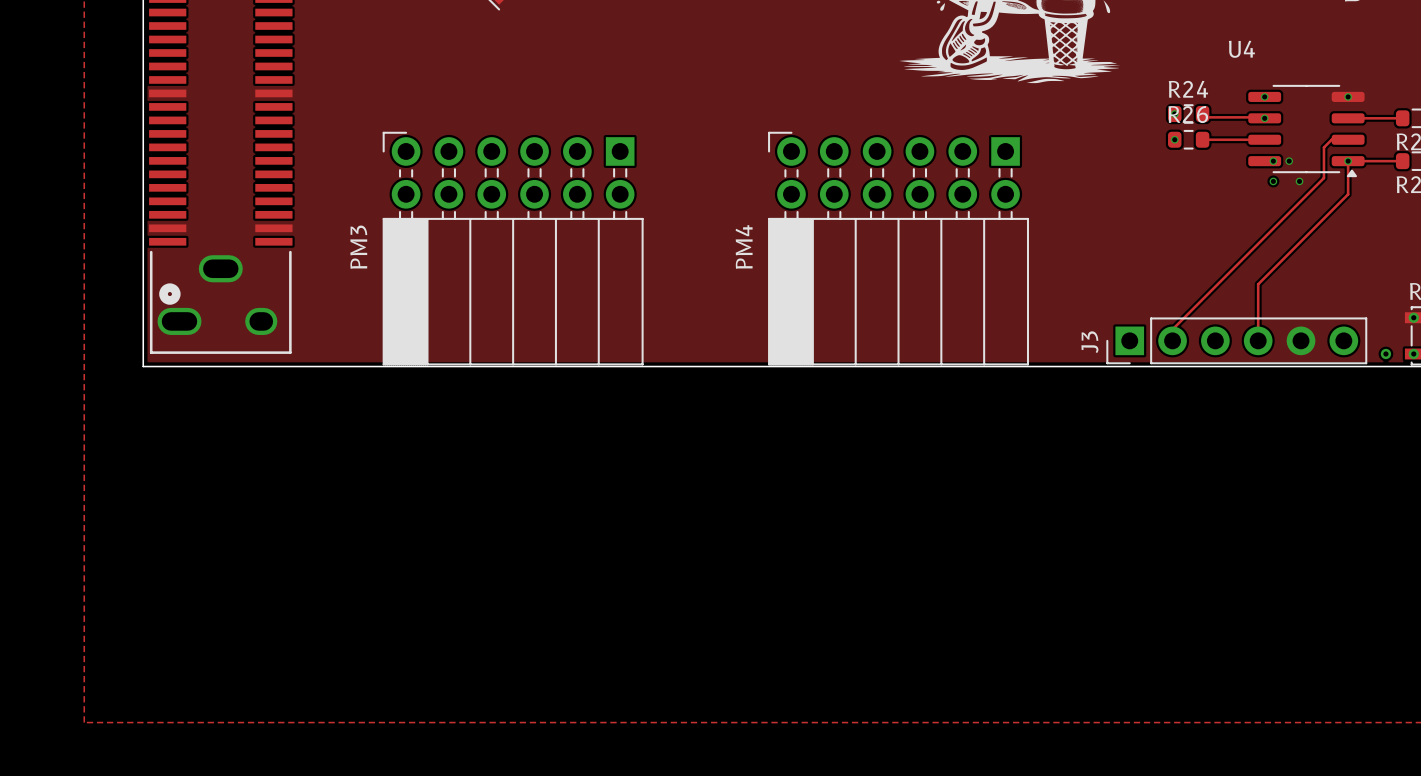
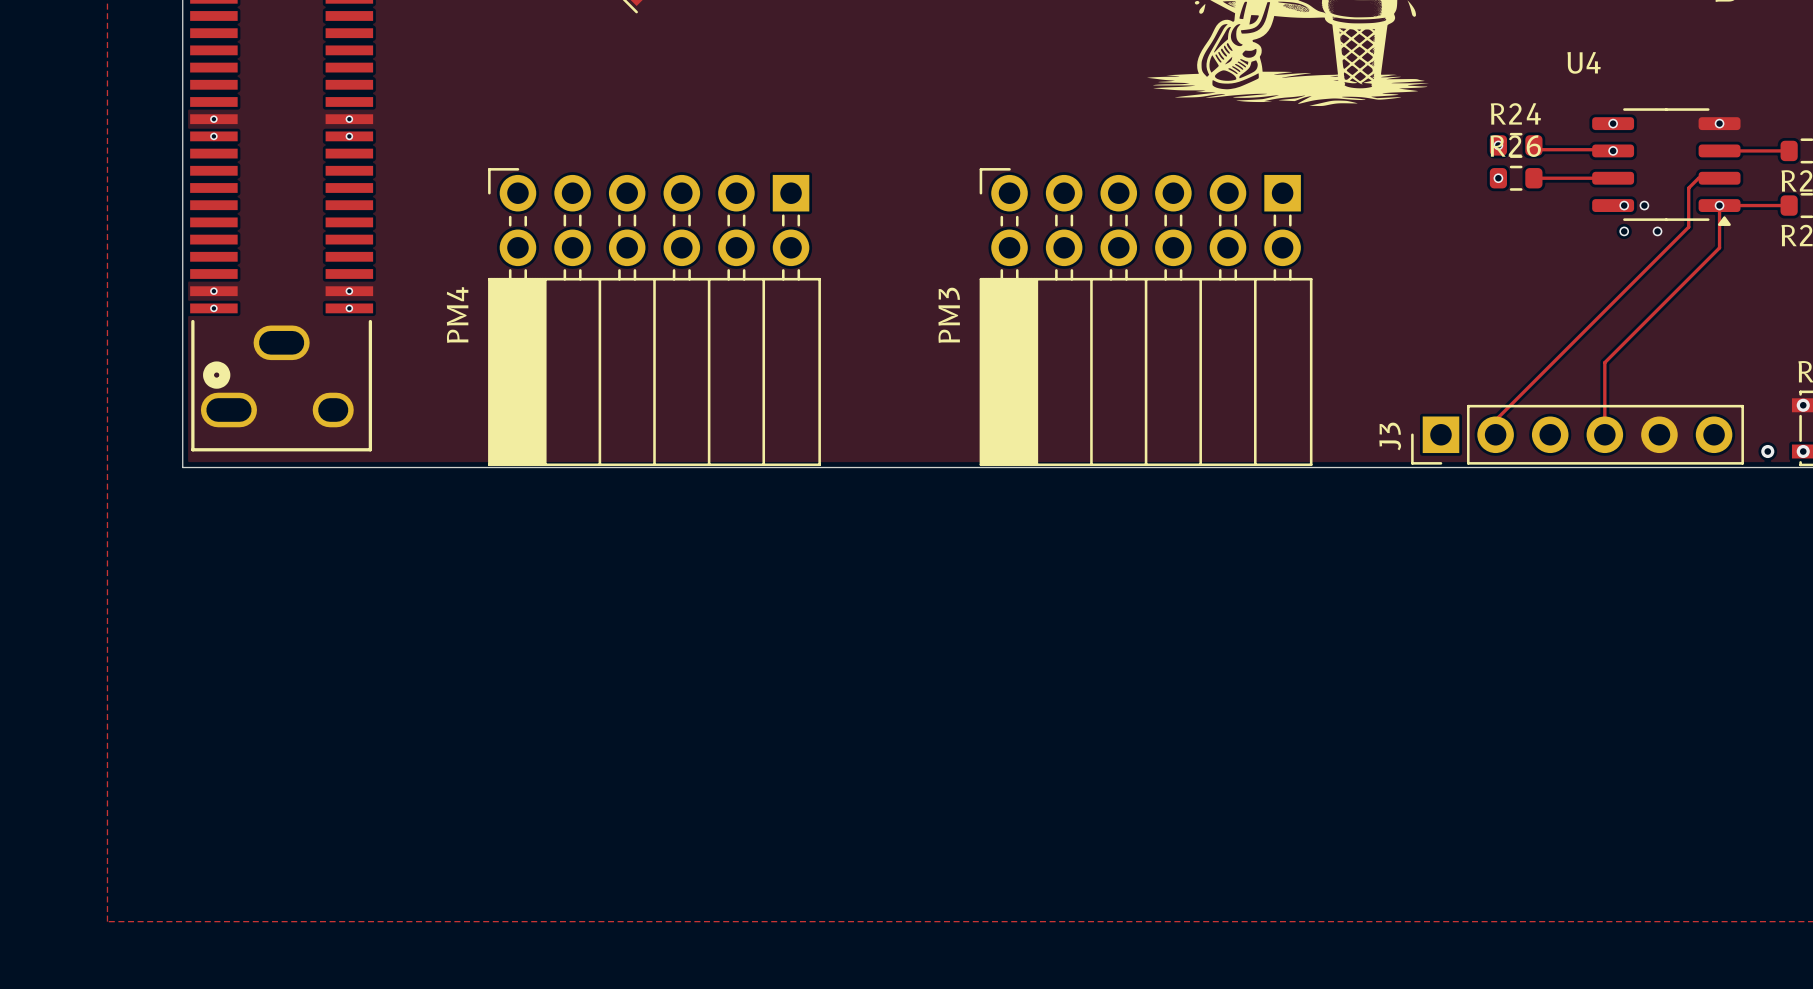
via: none -> (213, 119)
via: none -> (349, 119)
via: none -> (213, 136)
via: none -> (349, 136)
via: none -> (213, 291)
via: none -> (349, 291)
via: none -> (213, 308)
via: none -> (349, 308)
PM4 name: PM4 (744, 246) -> PM3 (949, 315)
PM3 name: PM3 (358, 247) -> PM4 (457, 315)

